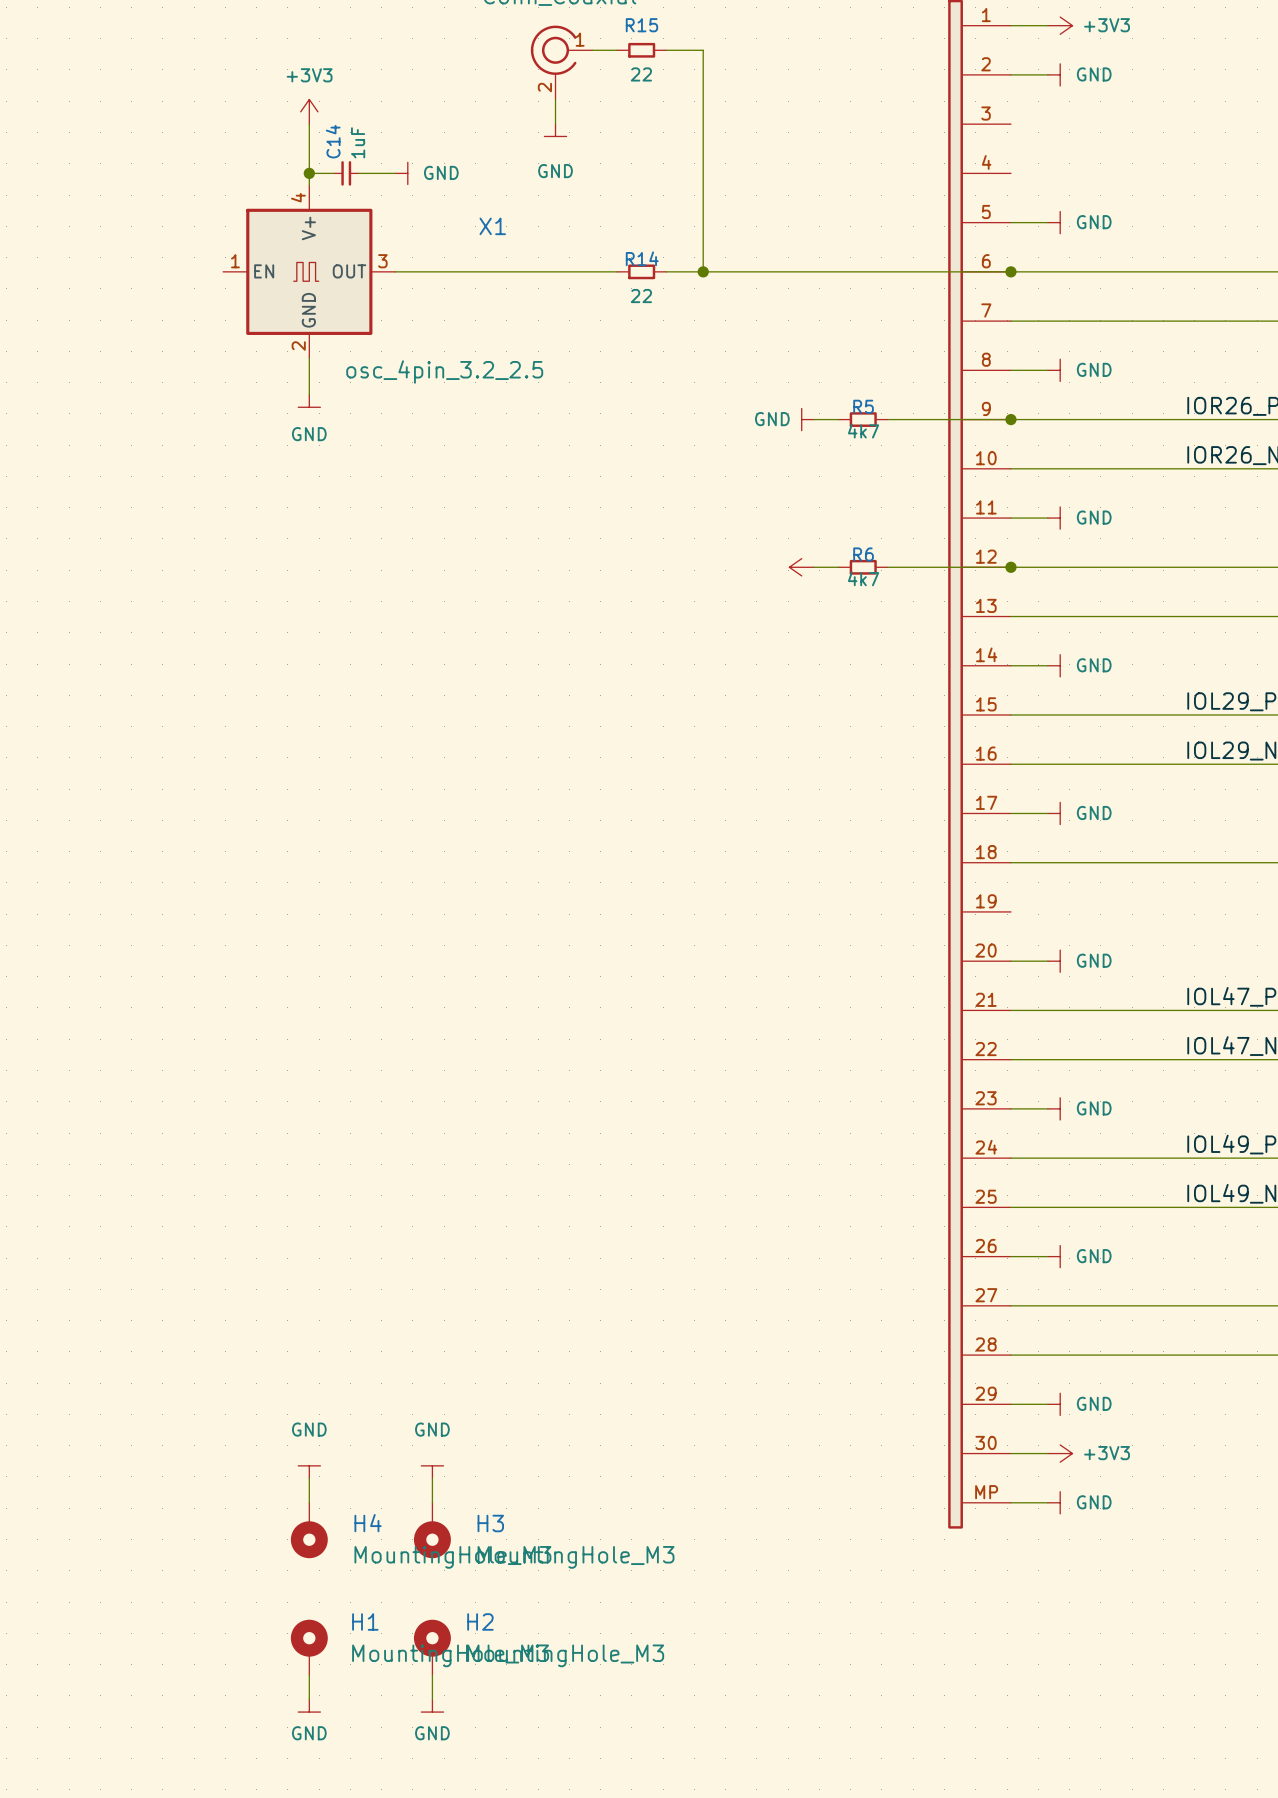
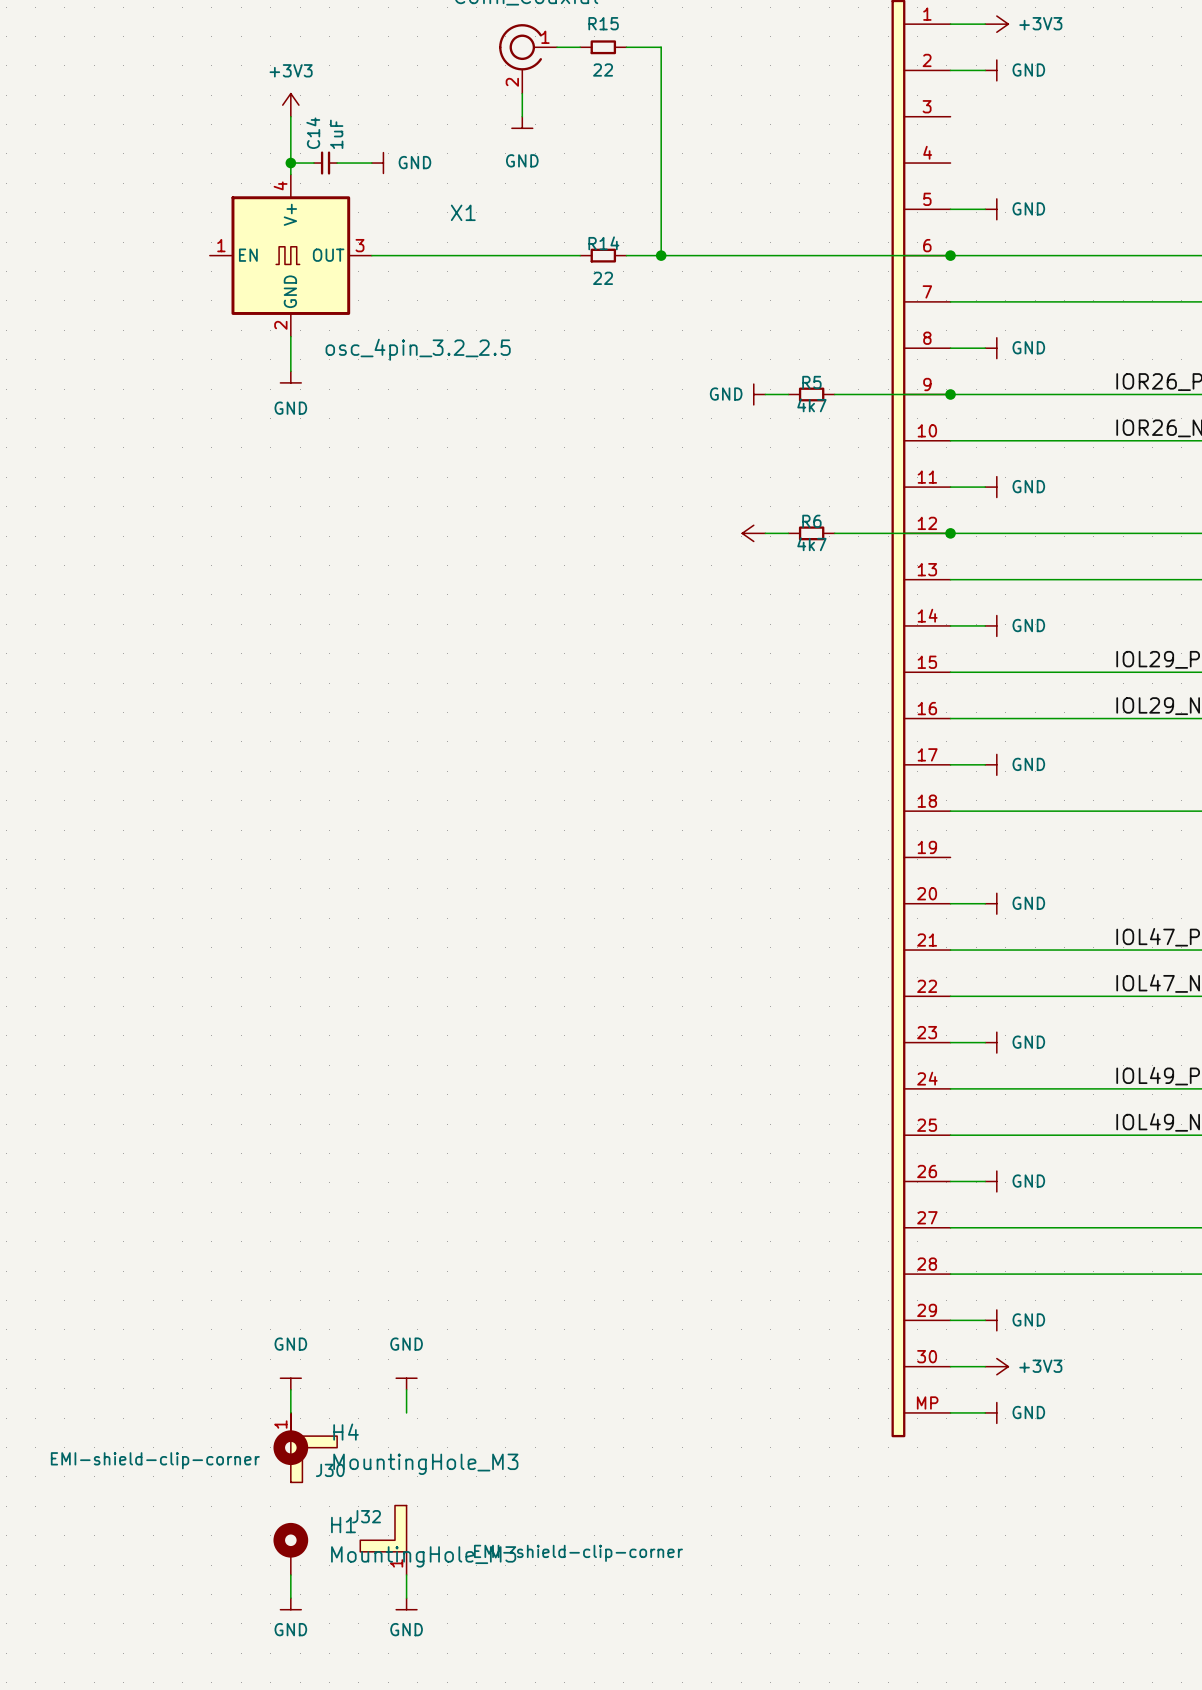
H3: MountingHole_M3 (432, 1530) -> none
J30: none -> EMI-shield-clip-corner (313, 1447)
J32: none -> EMI-shield-clip-corner (383, 1540)
H2: MountingHole_M3 (432, 1647) -> none

